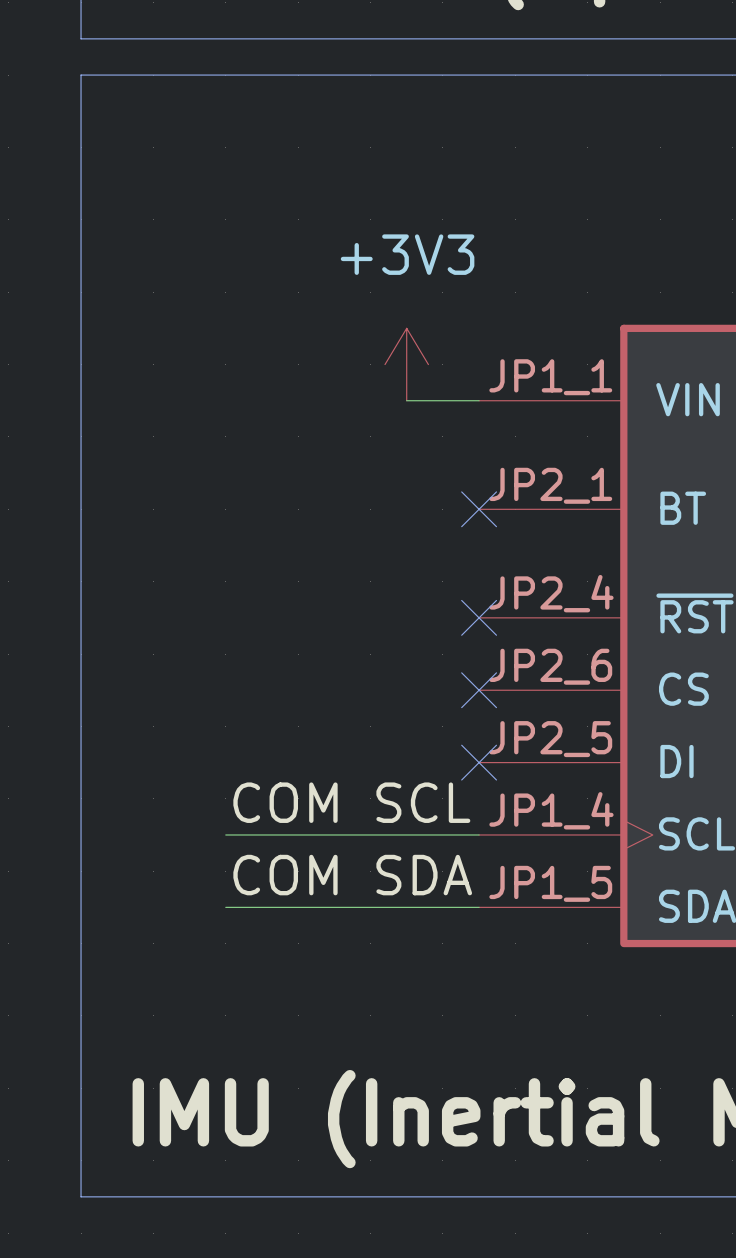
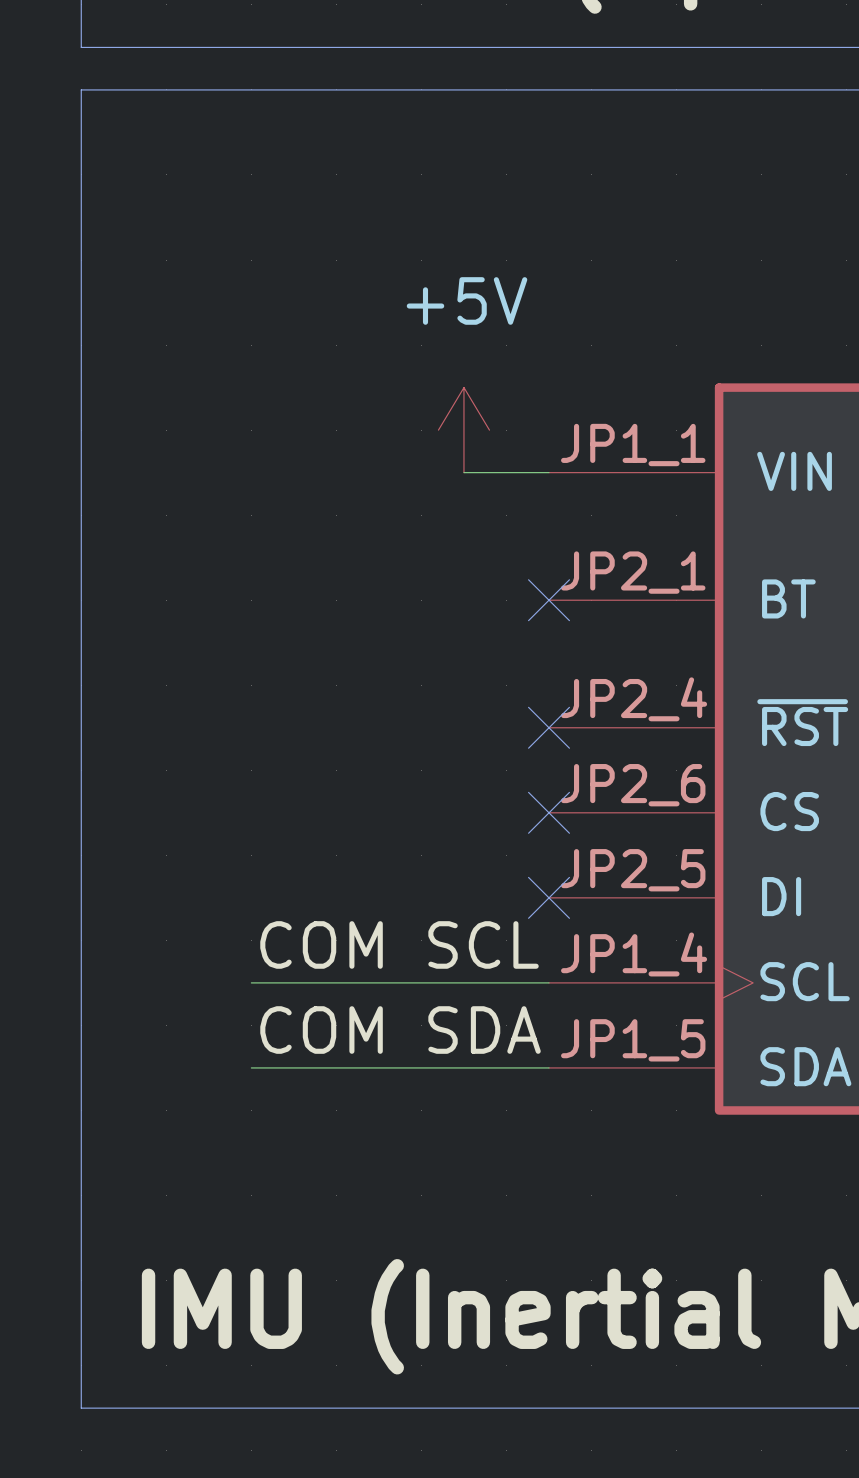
power symbol: +3V3 (406, 364) -> +5V (463, 430)

